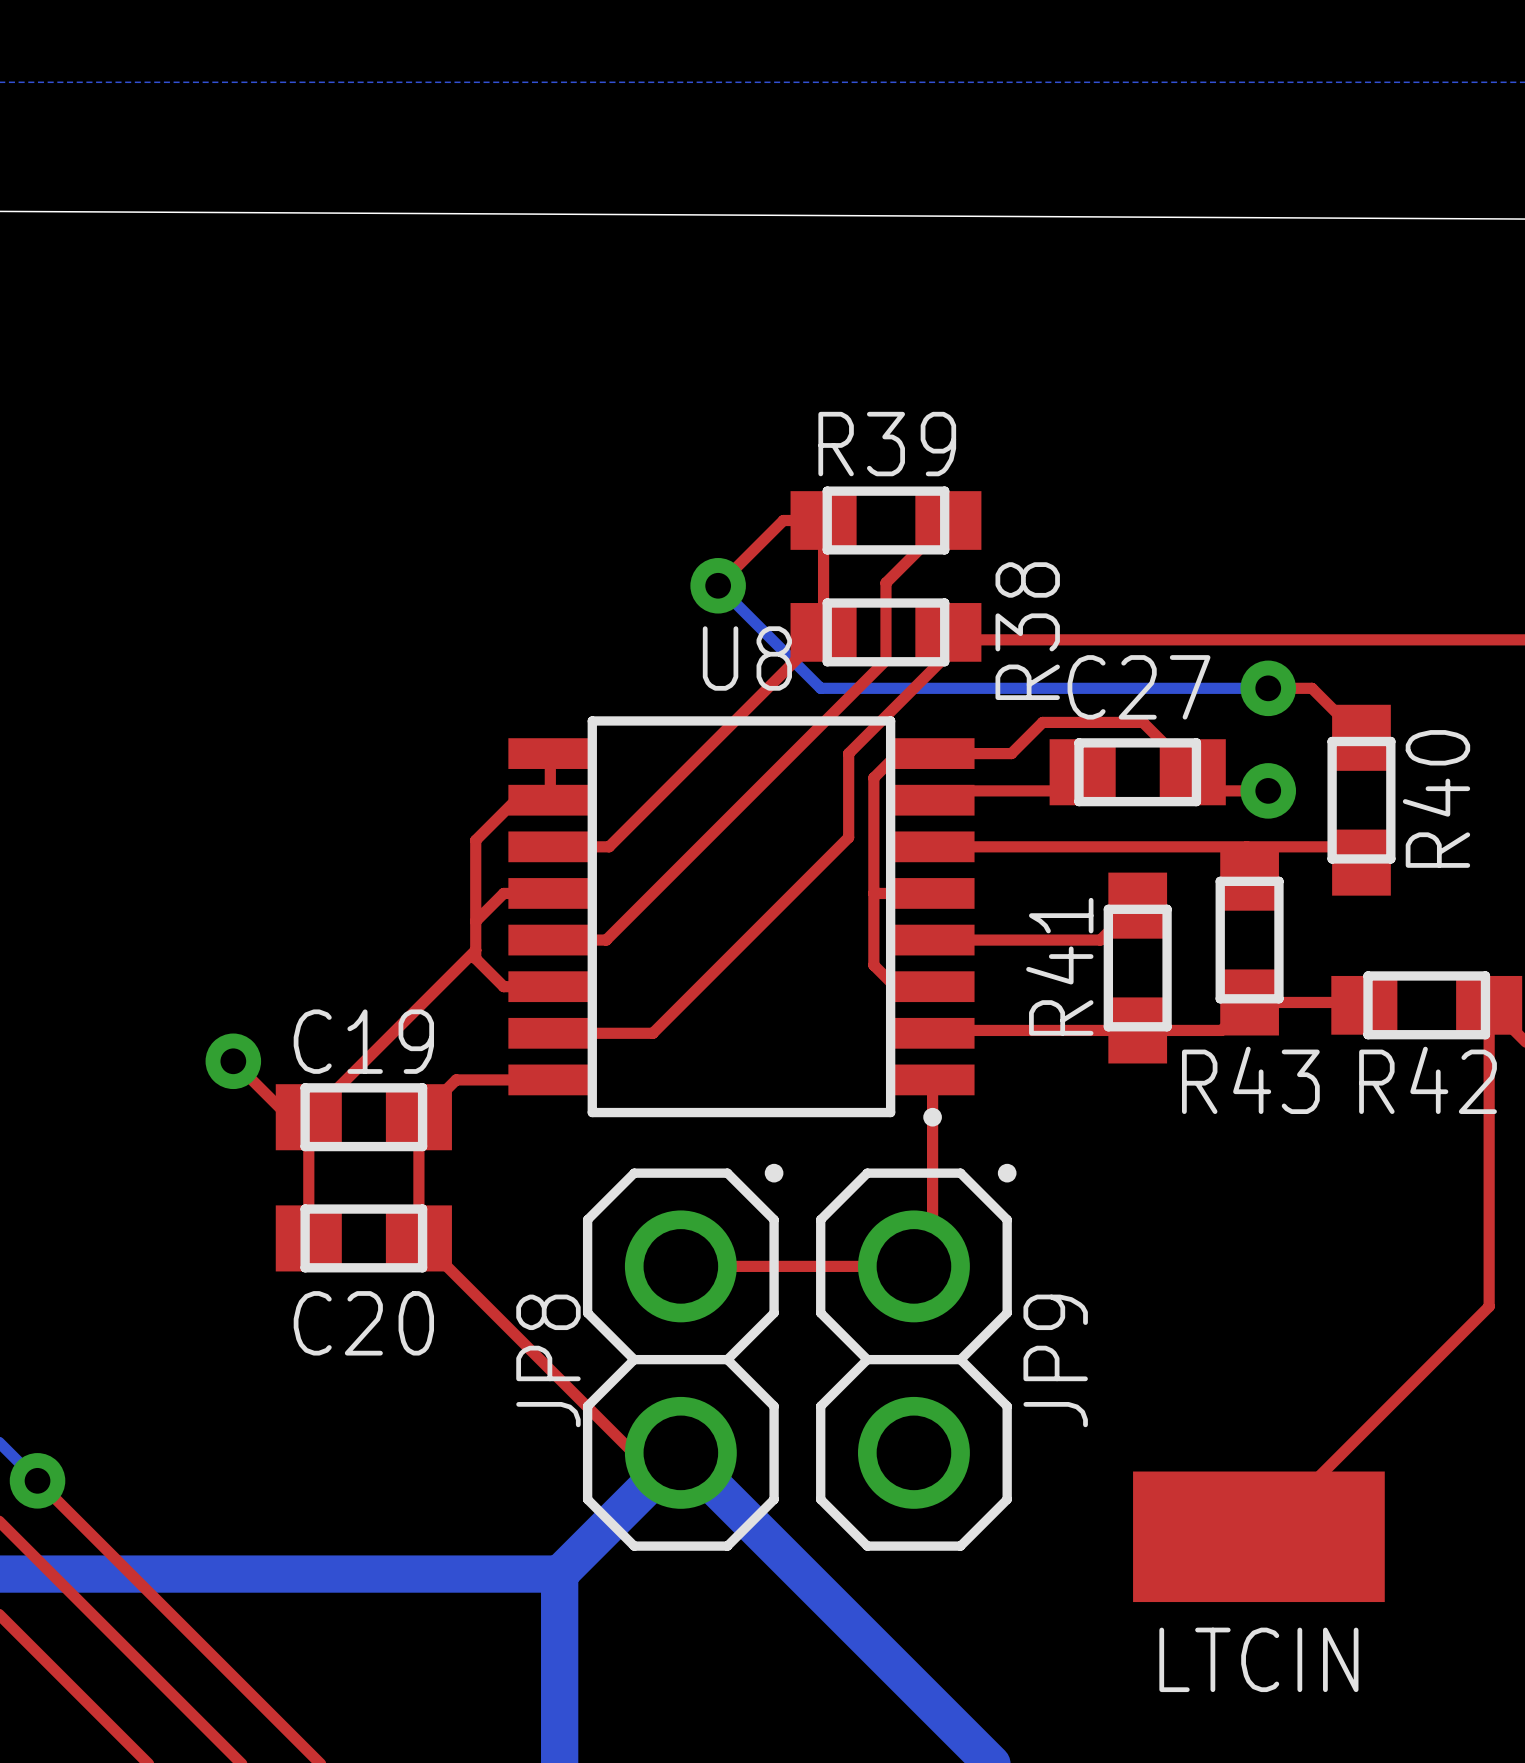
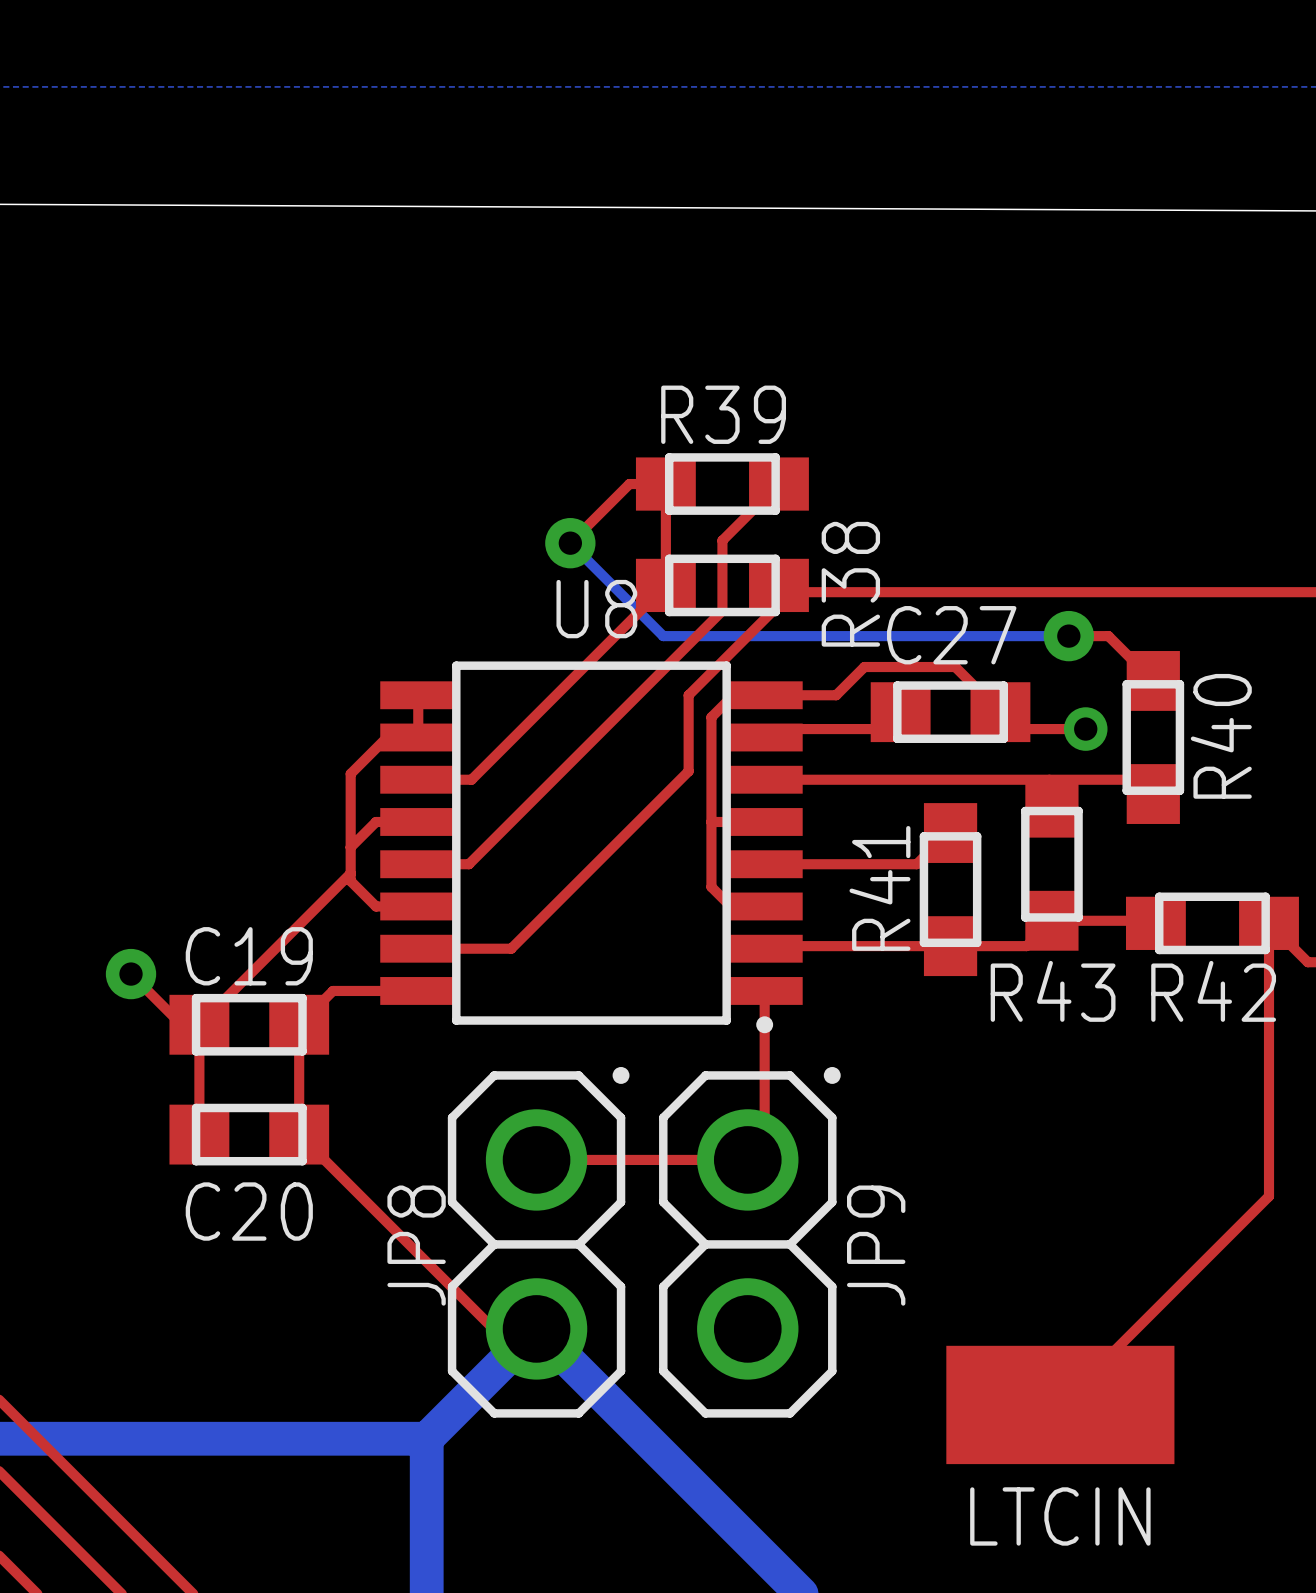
via position: (1268, 790) -> (1085, 729)

